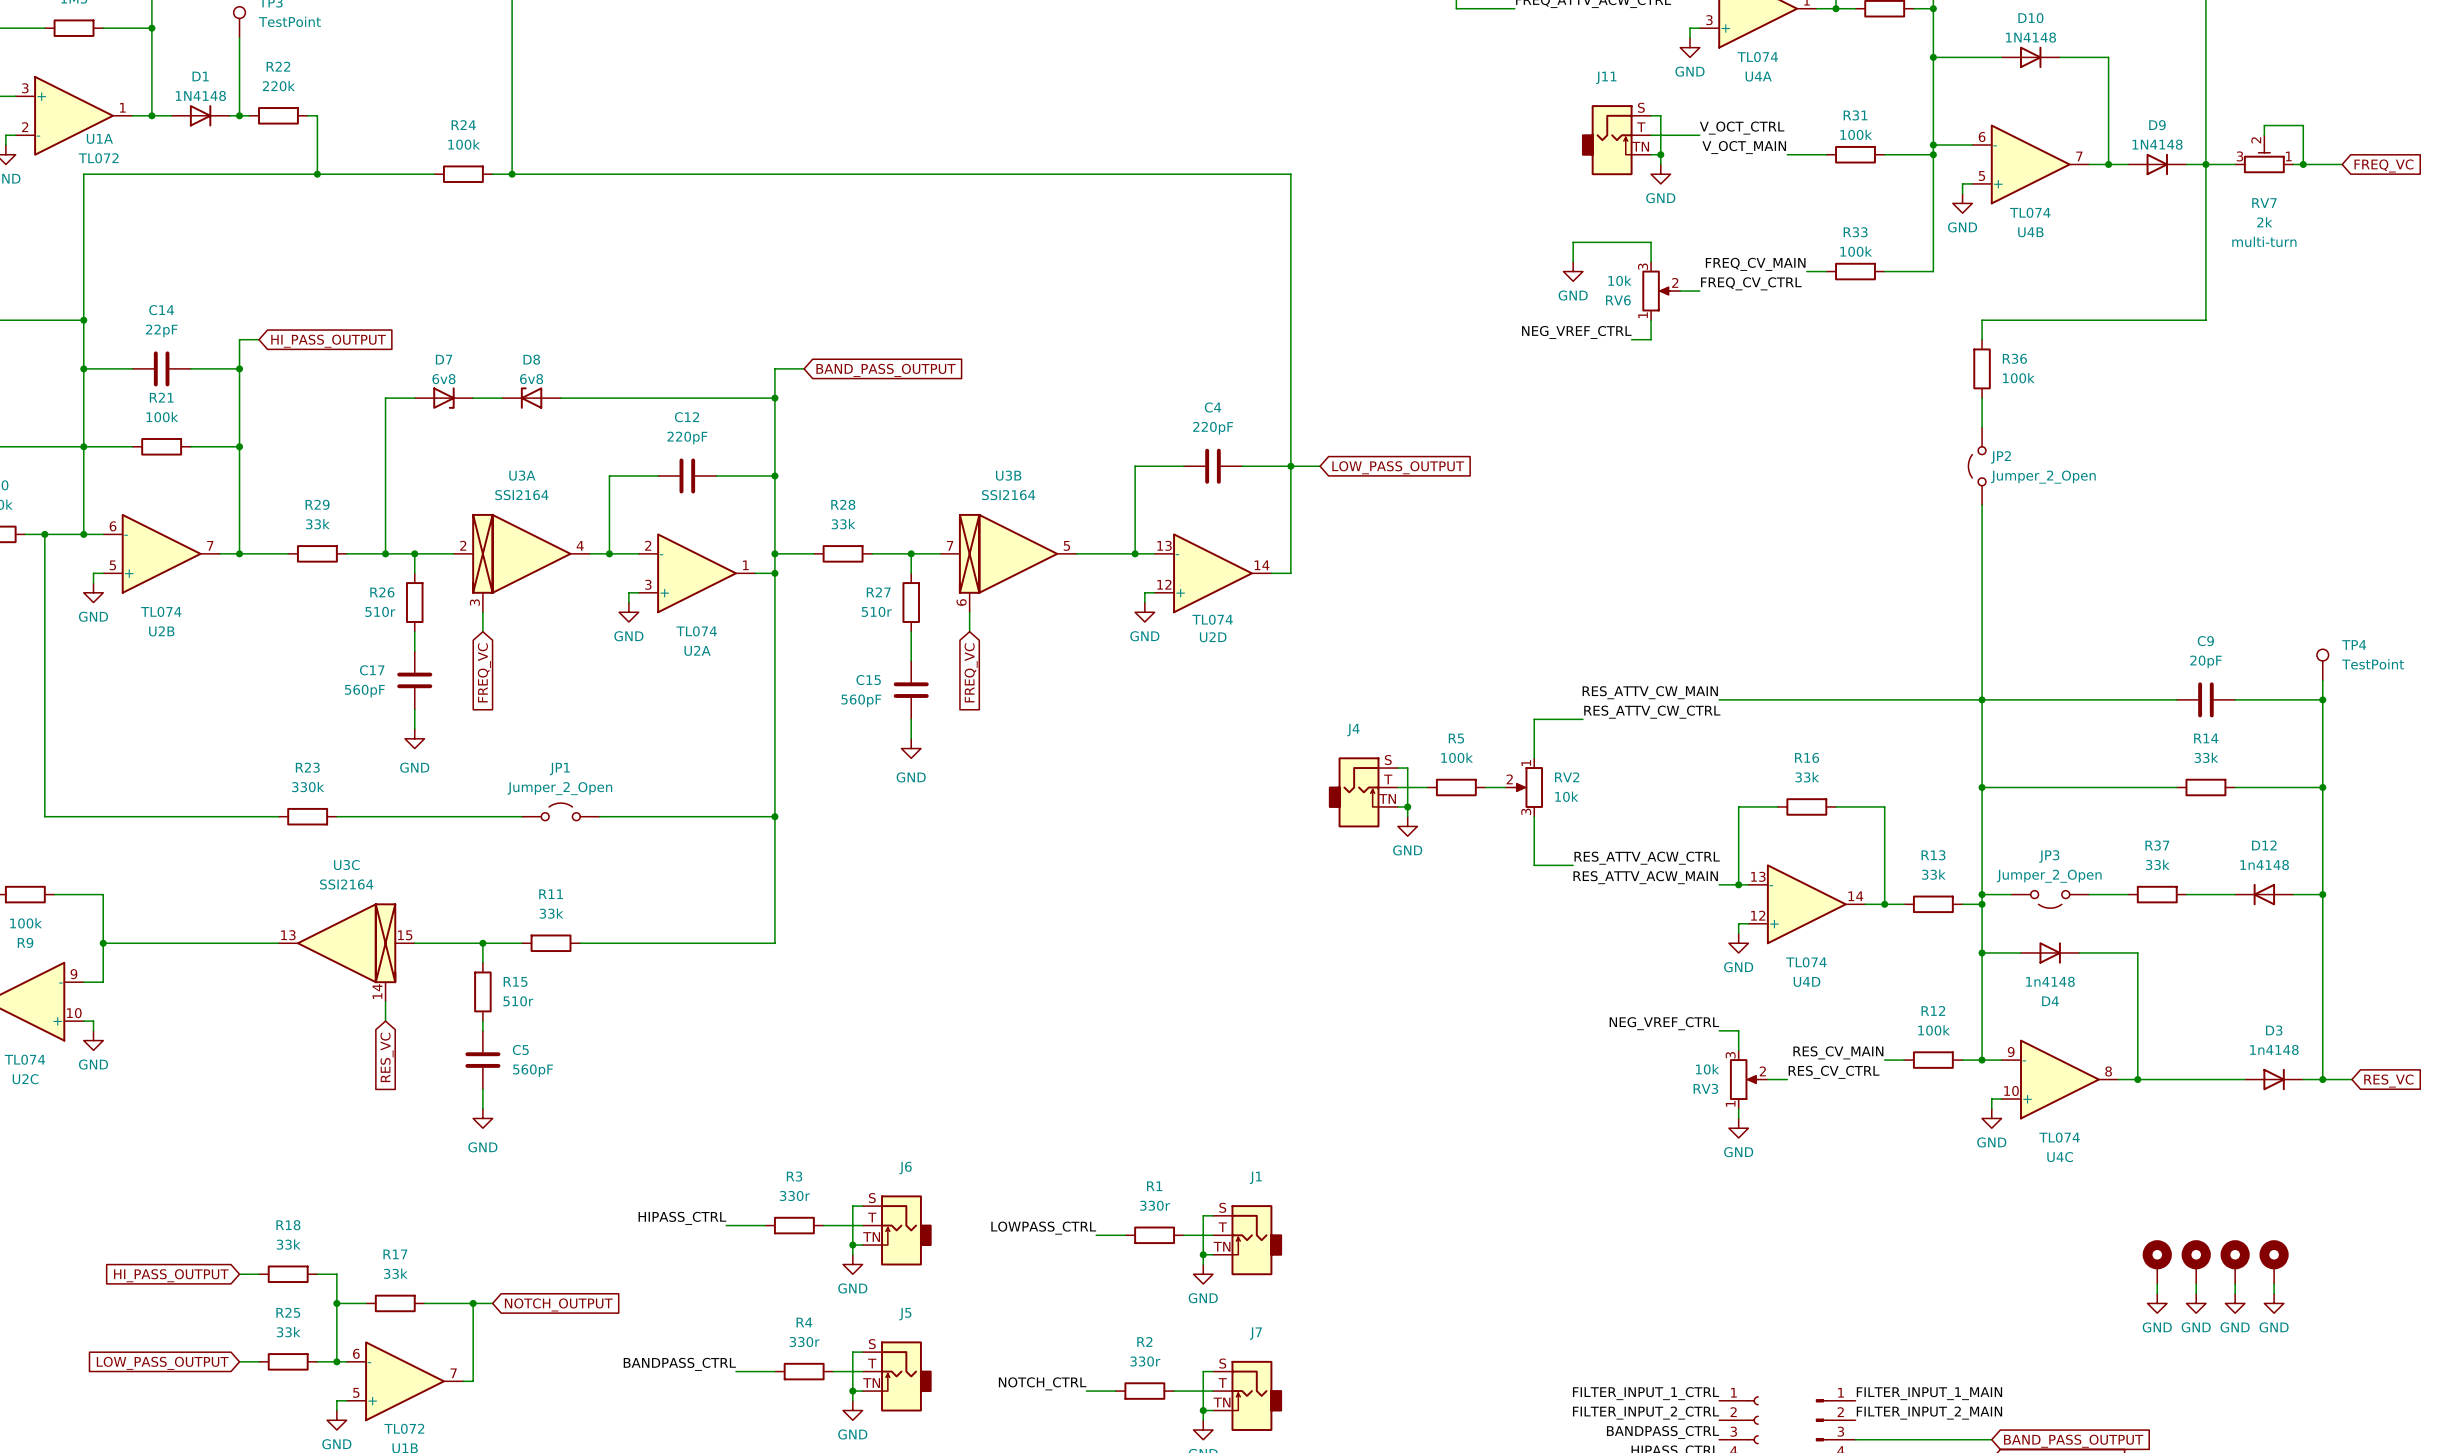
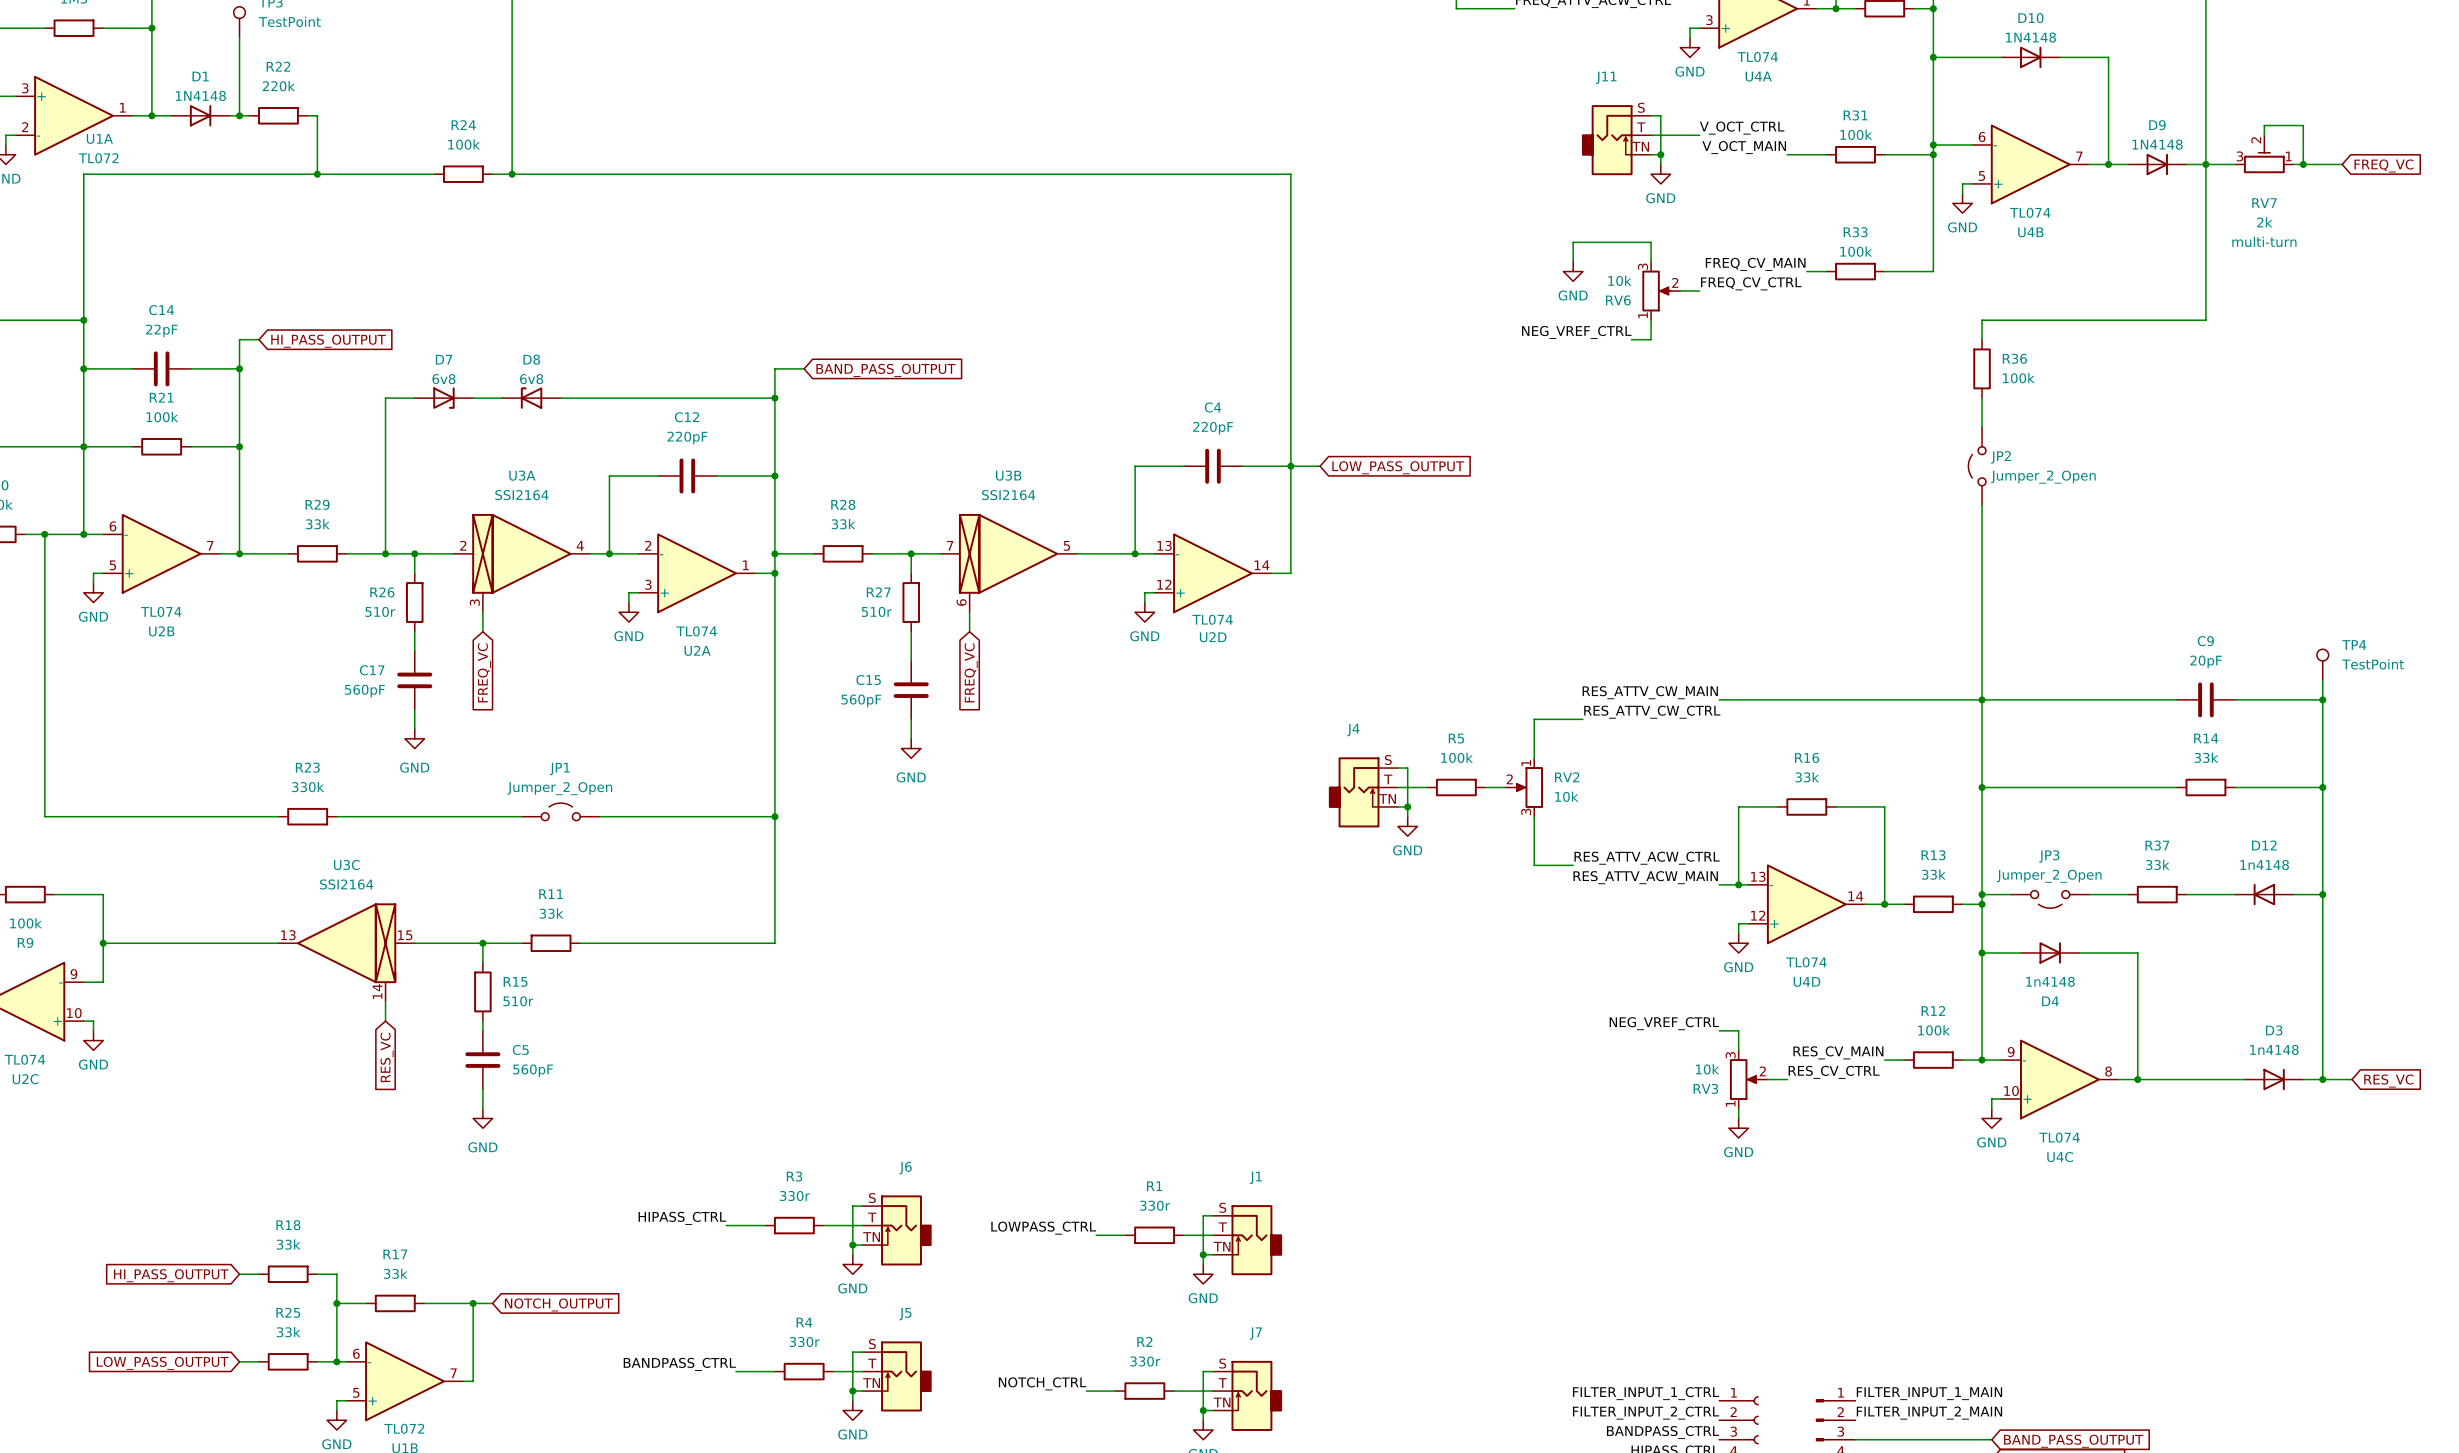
part: (2157, 1262) -> none
part: (2196, 1262) -> none
part: (2235, 1262) -> none
part: (2274, 1262) -> none
wire: (2157, 1283) (2157, 1293) -> none
wire: (2196, 1283) (2196, 1293) -> none
wire: (2235, 1283) (2235, 1293) -> none
wire: (2274, 1283) (2274, 1293) -> none
power symbol: GND (2157, 1303) -> none
power symbol: GND (2196, 1303) -> none
power symbol: GND (2235, 1303) -> none
power symbol: GND (2274, 1303) -> none

